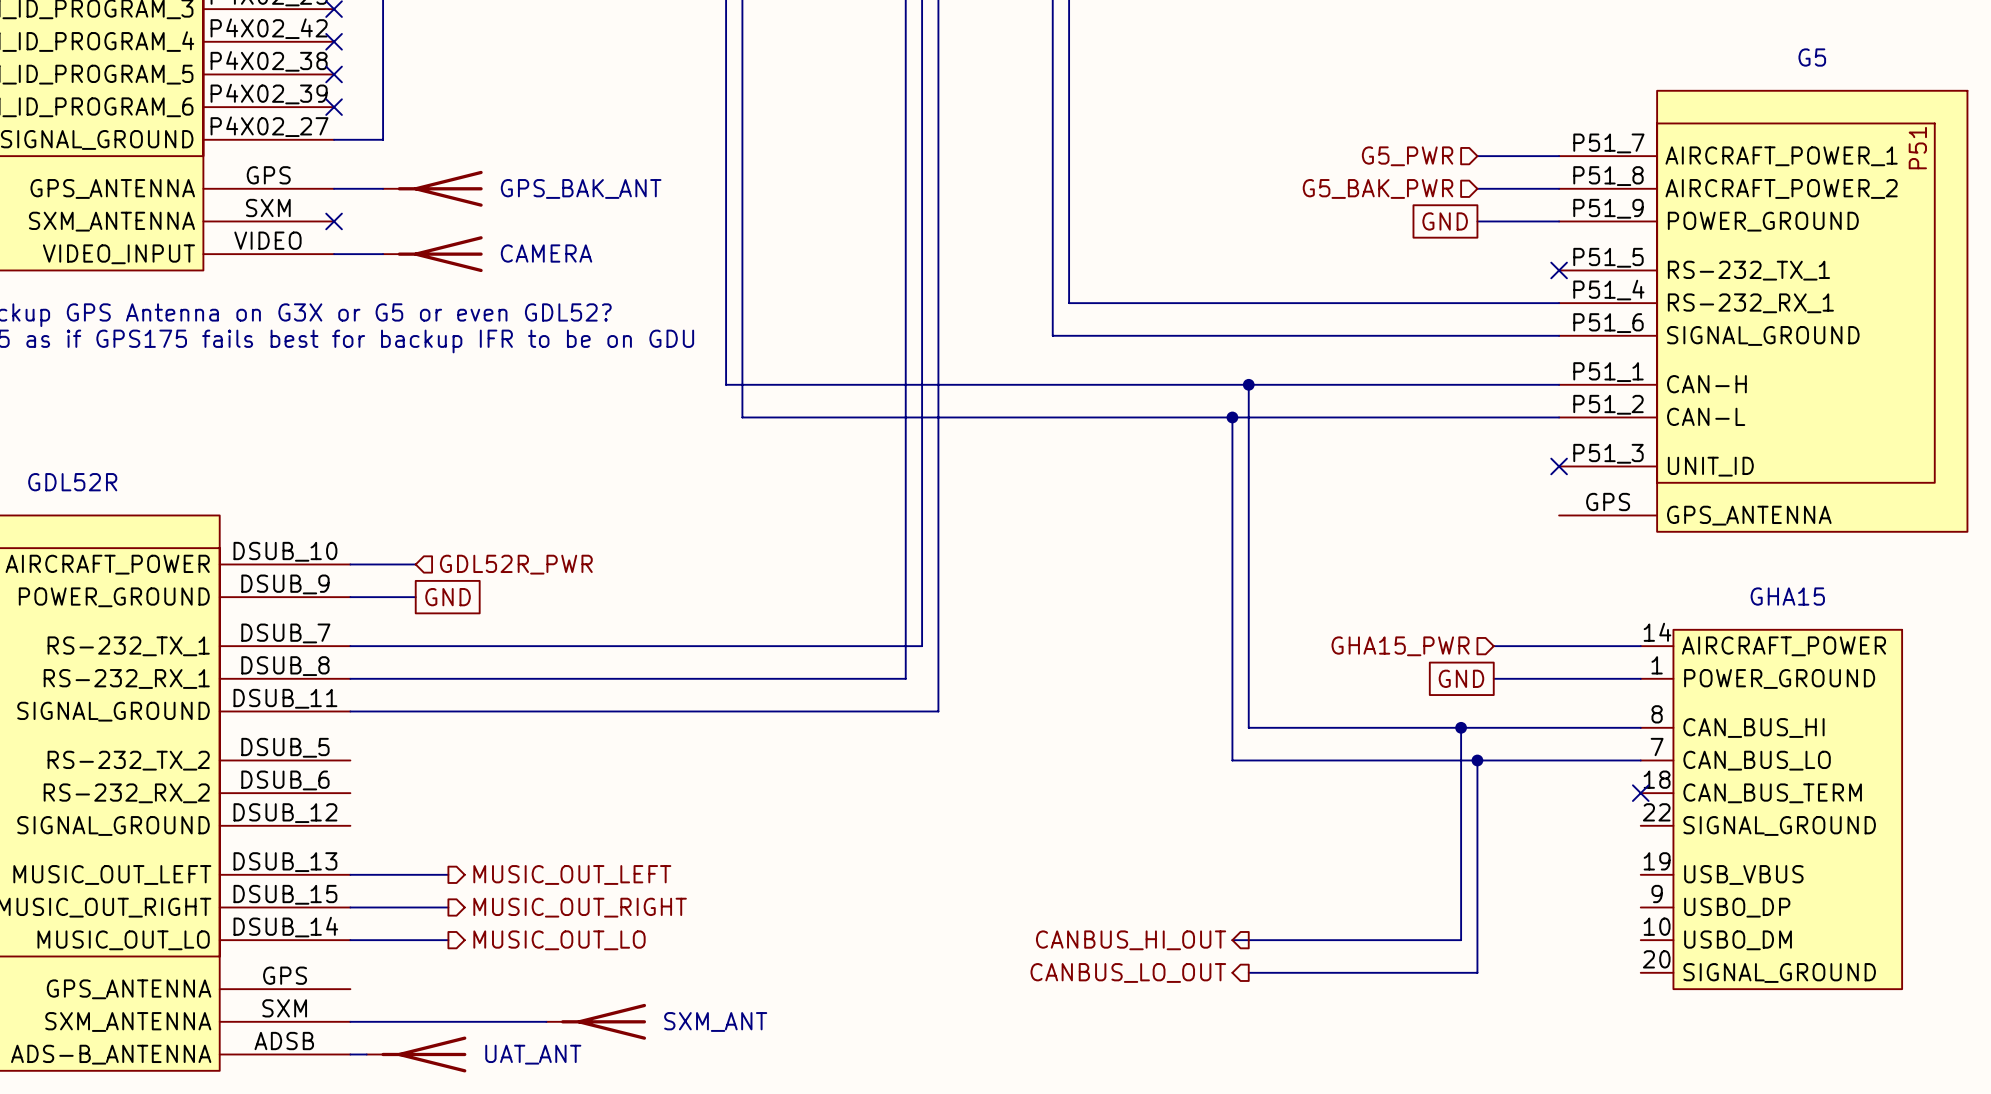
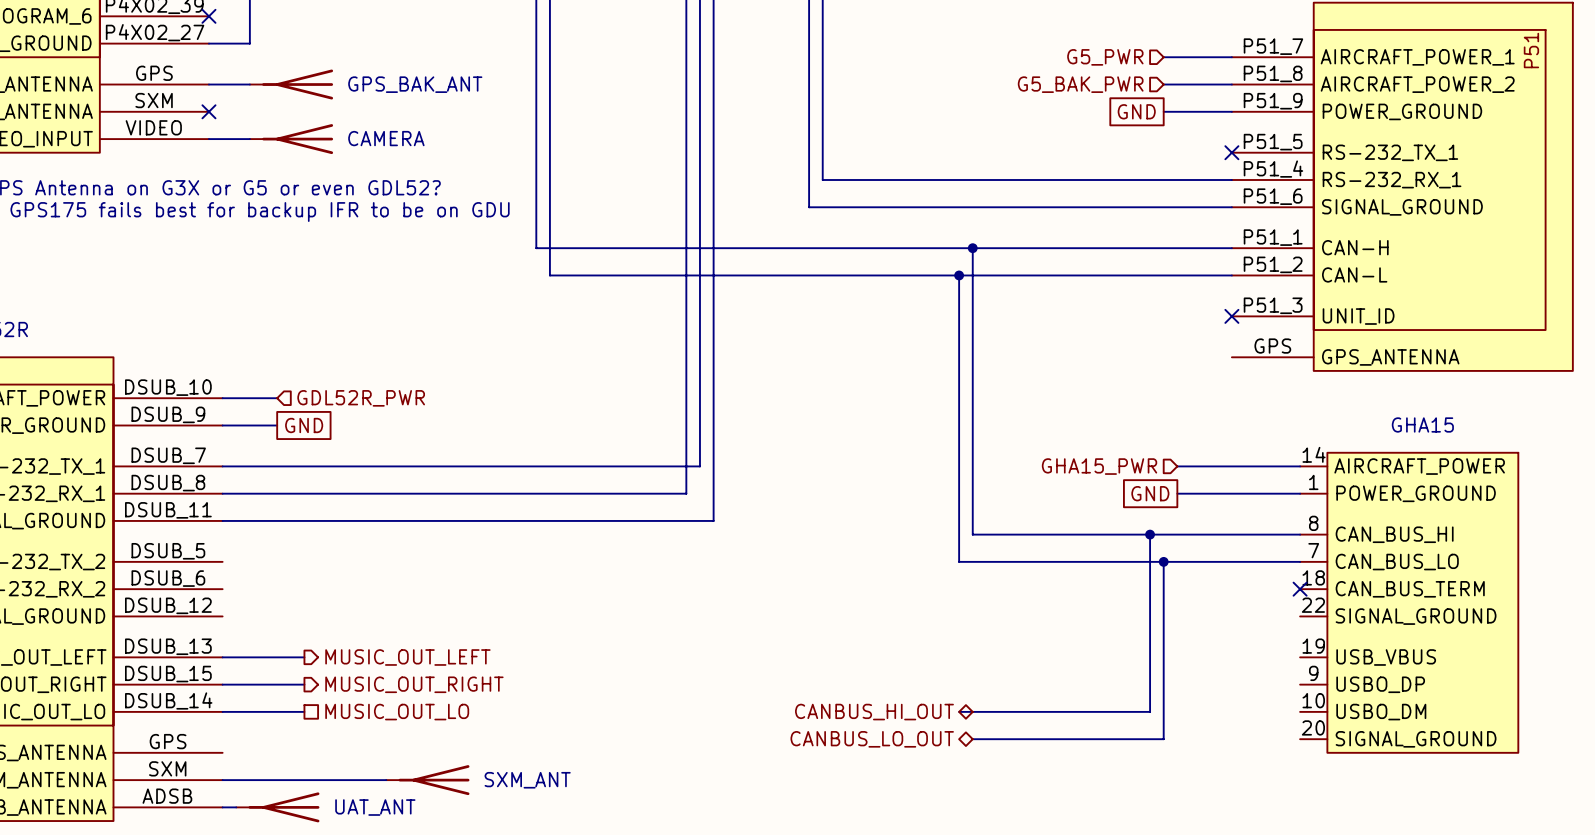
hierarchical label shape: output (559, 940) -> passive (397, 712)
hierarchical label shape: output (1131, 940) -> bidirectional (874, 712)
hierarchical label shape: output (1128, 972) -> bidirectional (872, 739)

